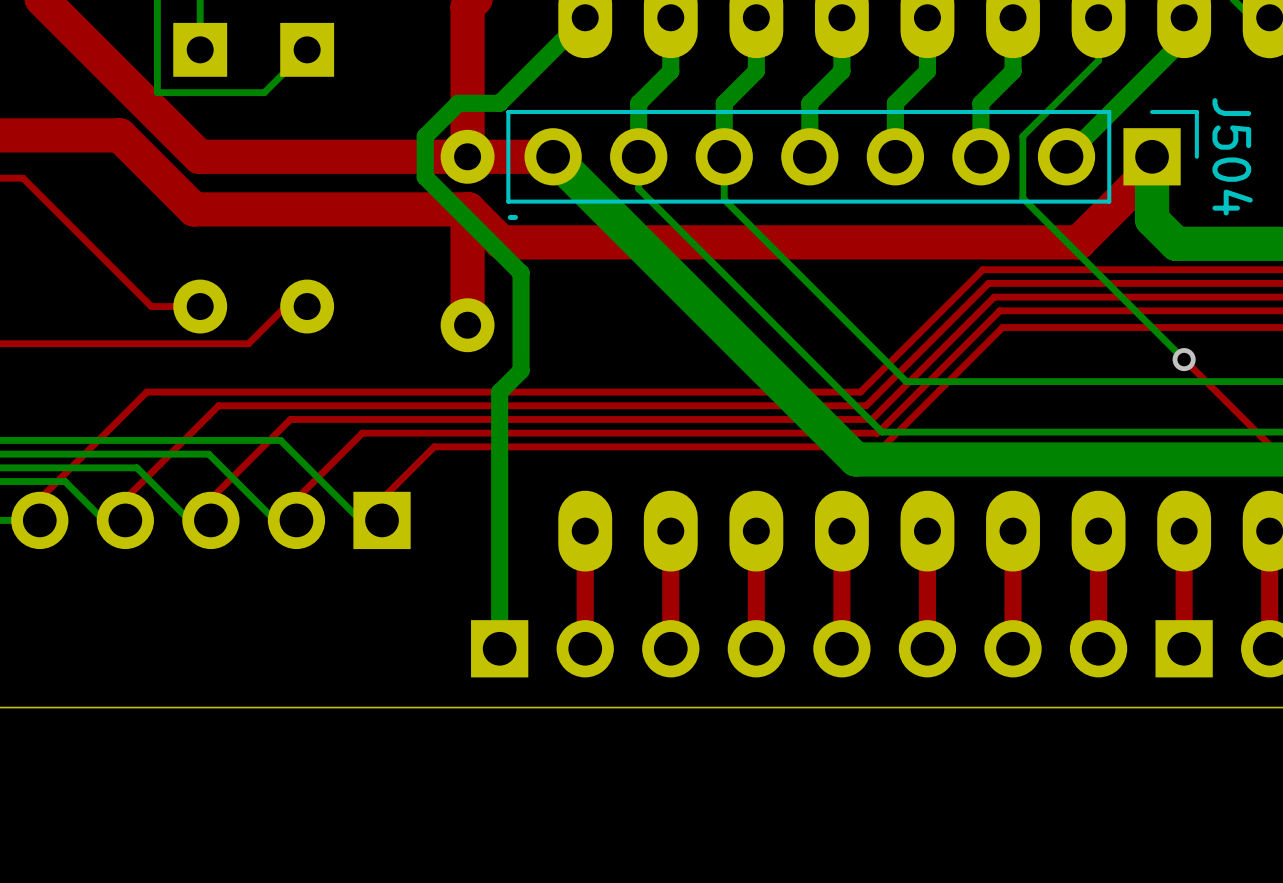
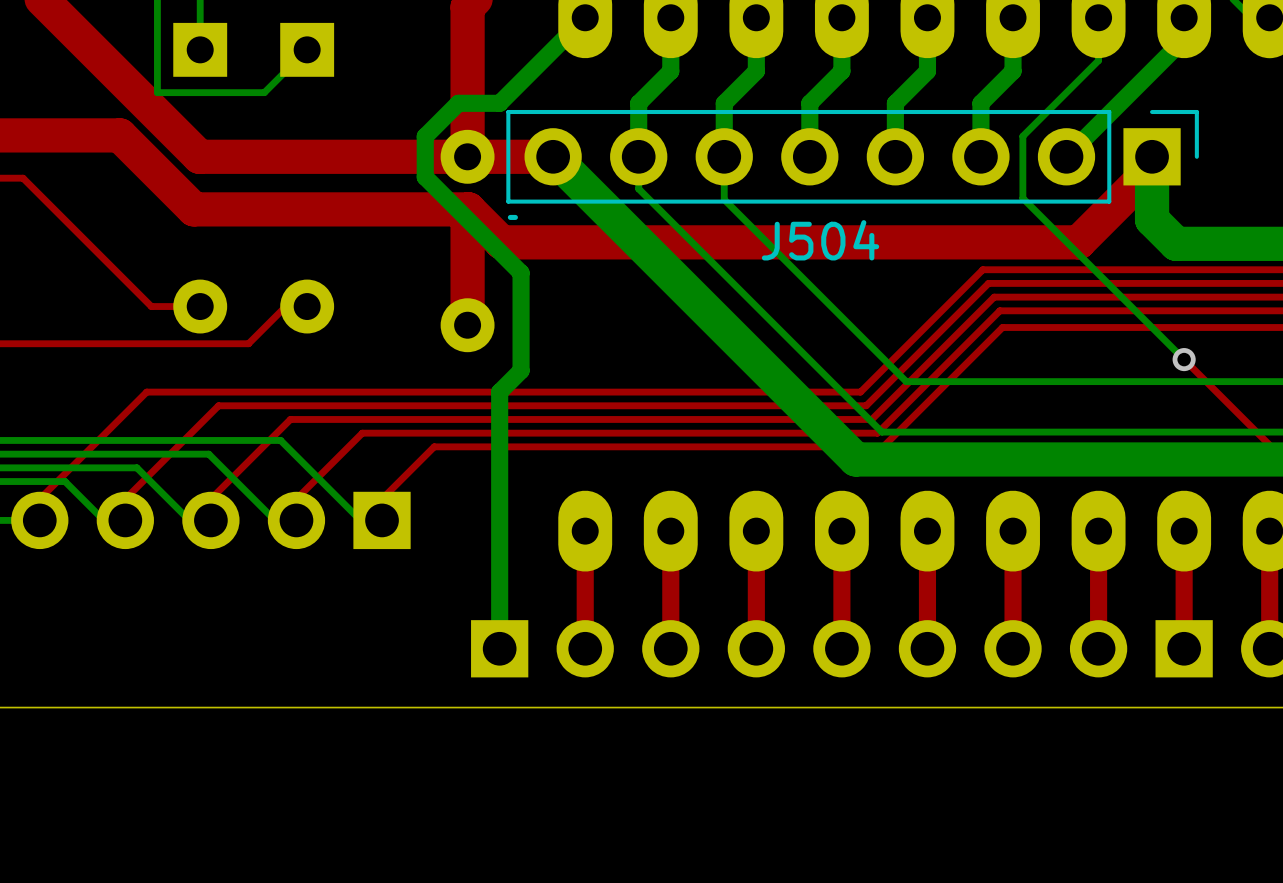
J504 name rotation: 0° (1232, 156) -> 90° counterclockwise (820, 240)
J504 name position: J504 (1232, 156) -> J504 (820, 240)

